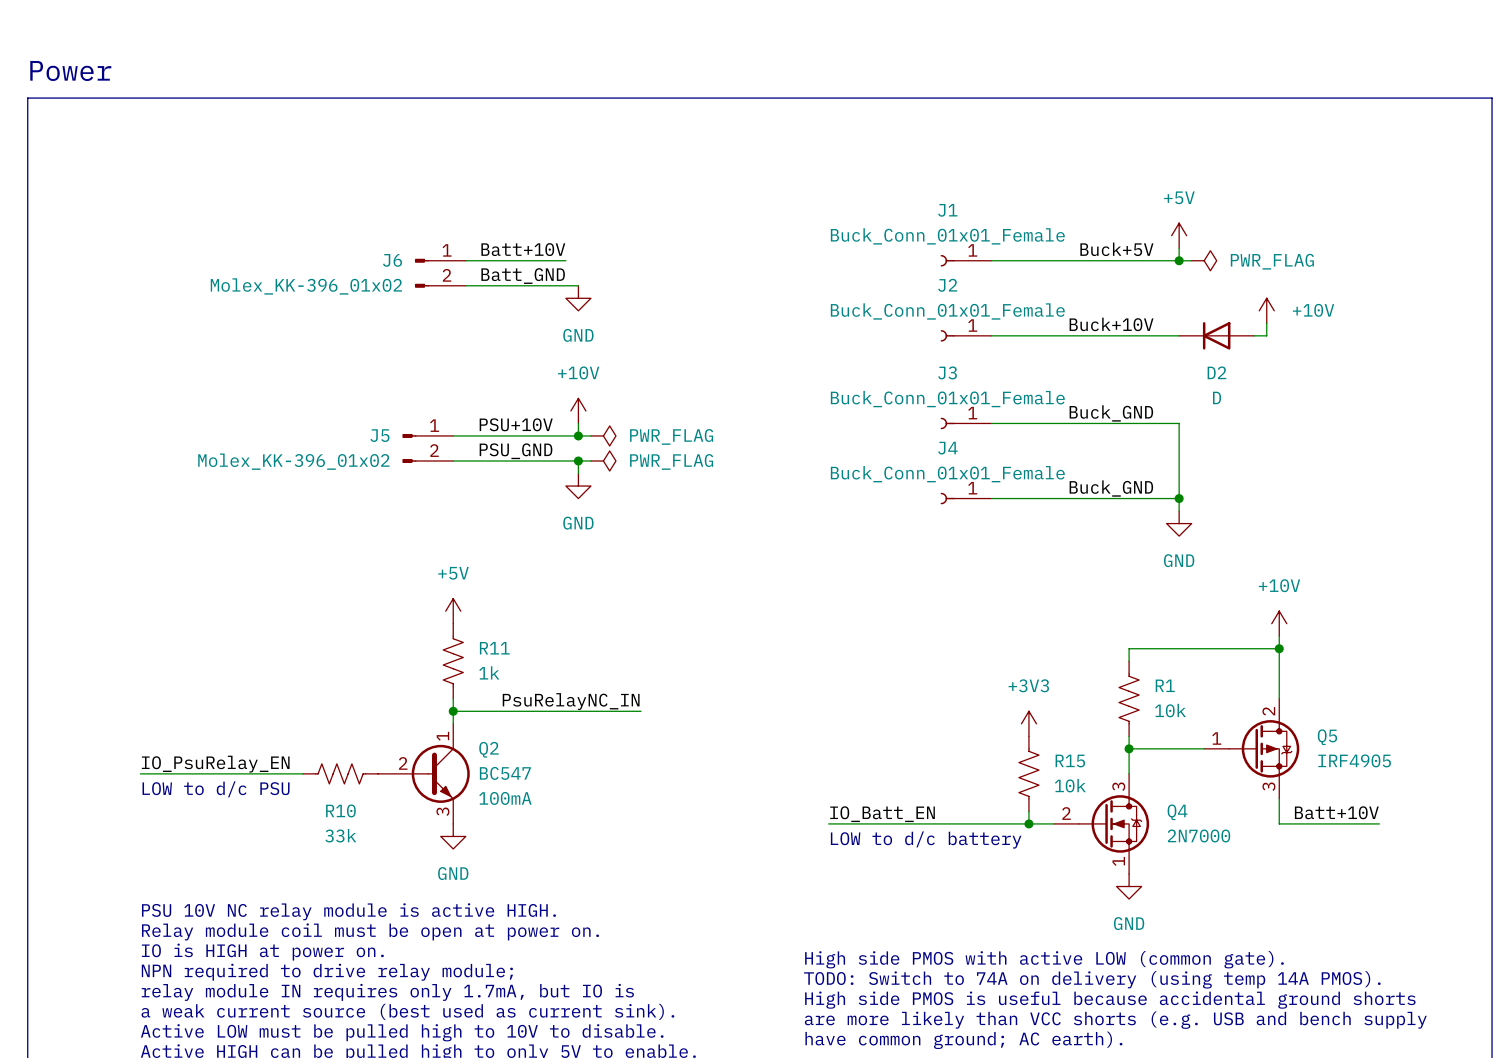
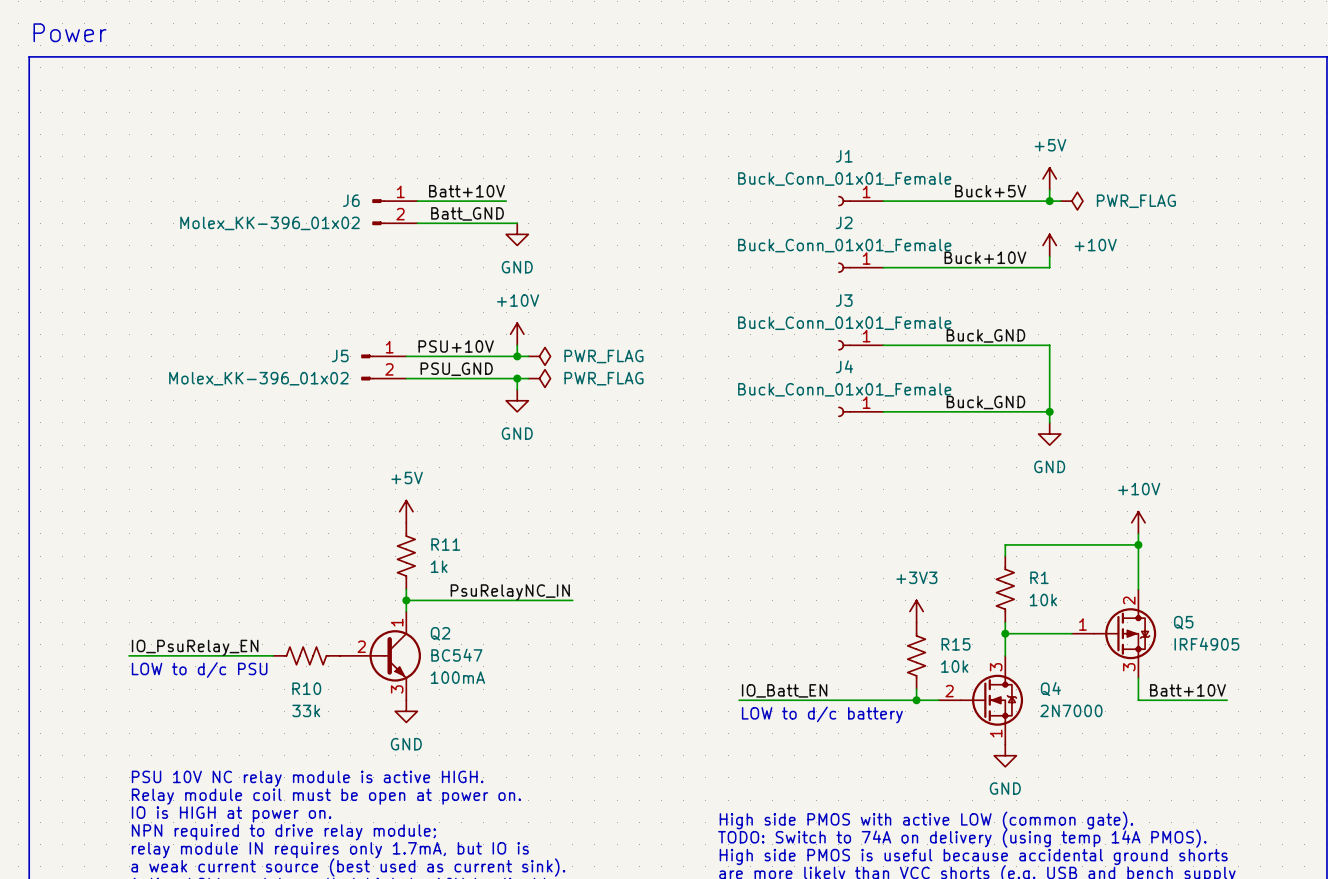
power symbol position: +10V (1266, 310) -> +10V (1049, 245)
wire: none -> (1049, 256) (1049, 267)
wire: (1266, 323) (1266, 335) (1254, 335) -> none
D2: D (1216, 335) -> none

